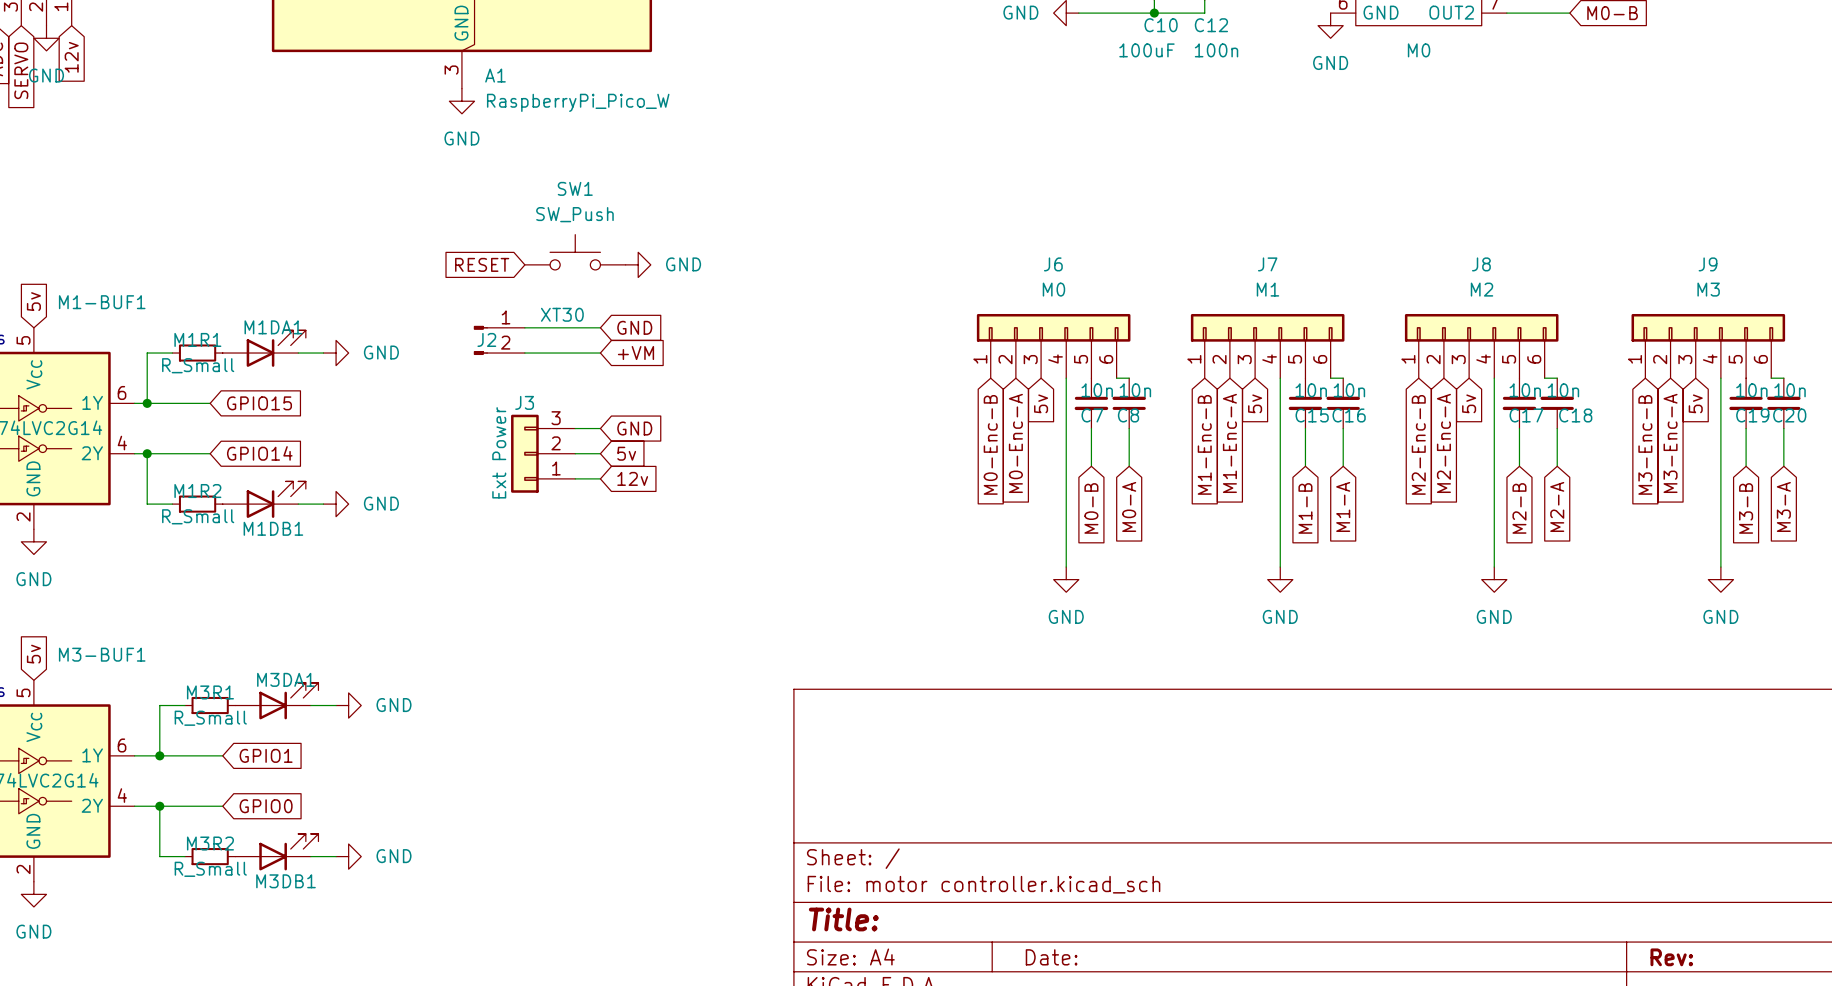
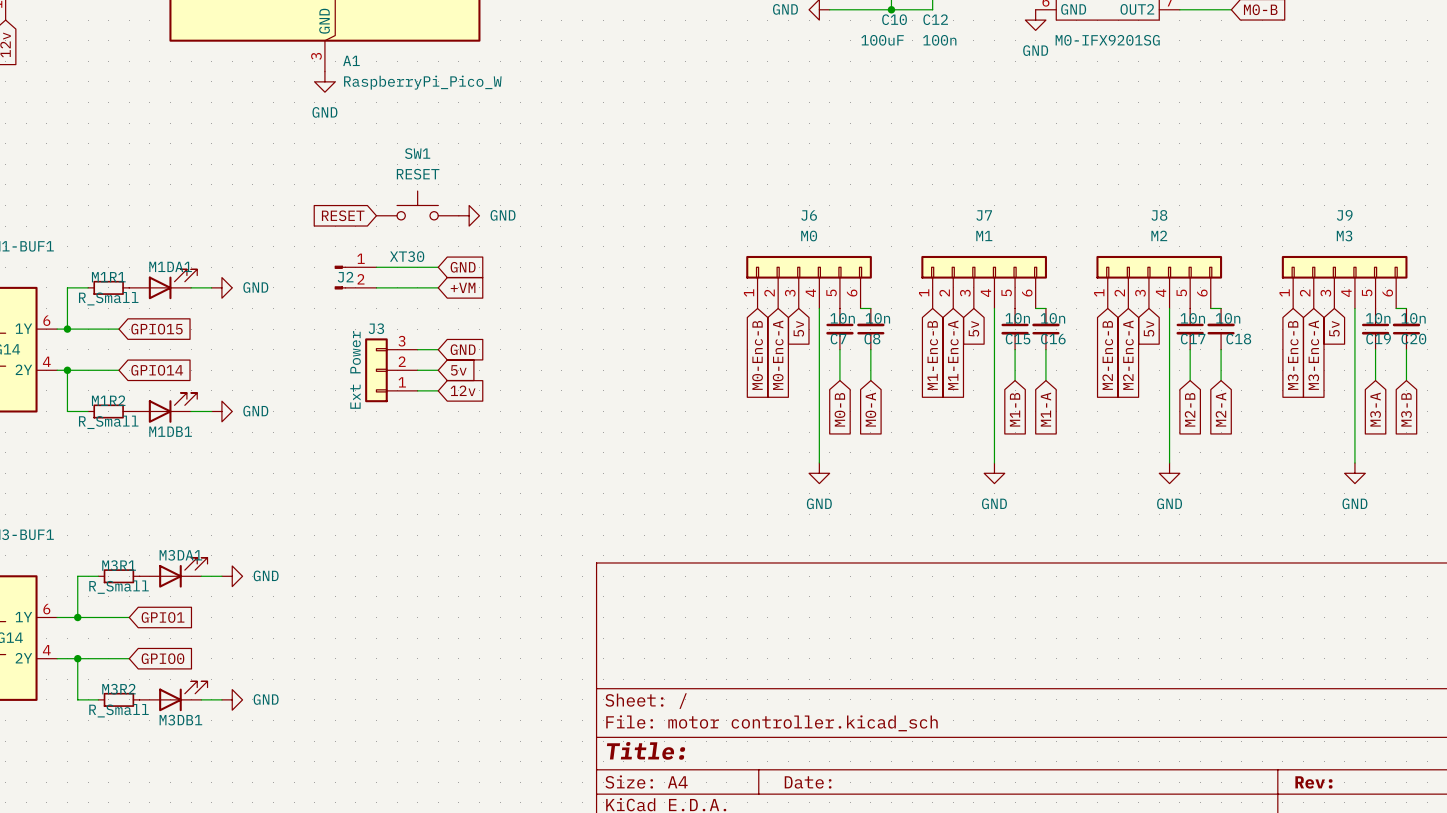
part value: M0 (1419, 50) -> M0-IFX9201SG (1107, 40)
SW1 value: SW_Push (574, 214) -> RESET (418, 174)
global label: M3-A (1783, 506) -> M3-B (1406, 409)
global label: M3-B (1746, 508) -> M3-A (1375, 409)

